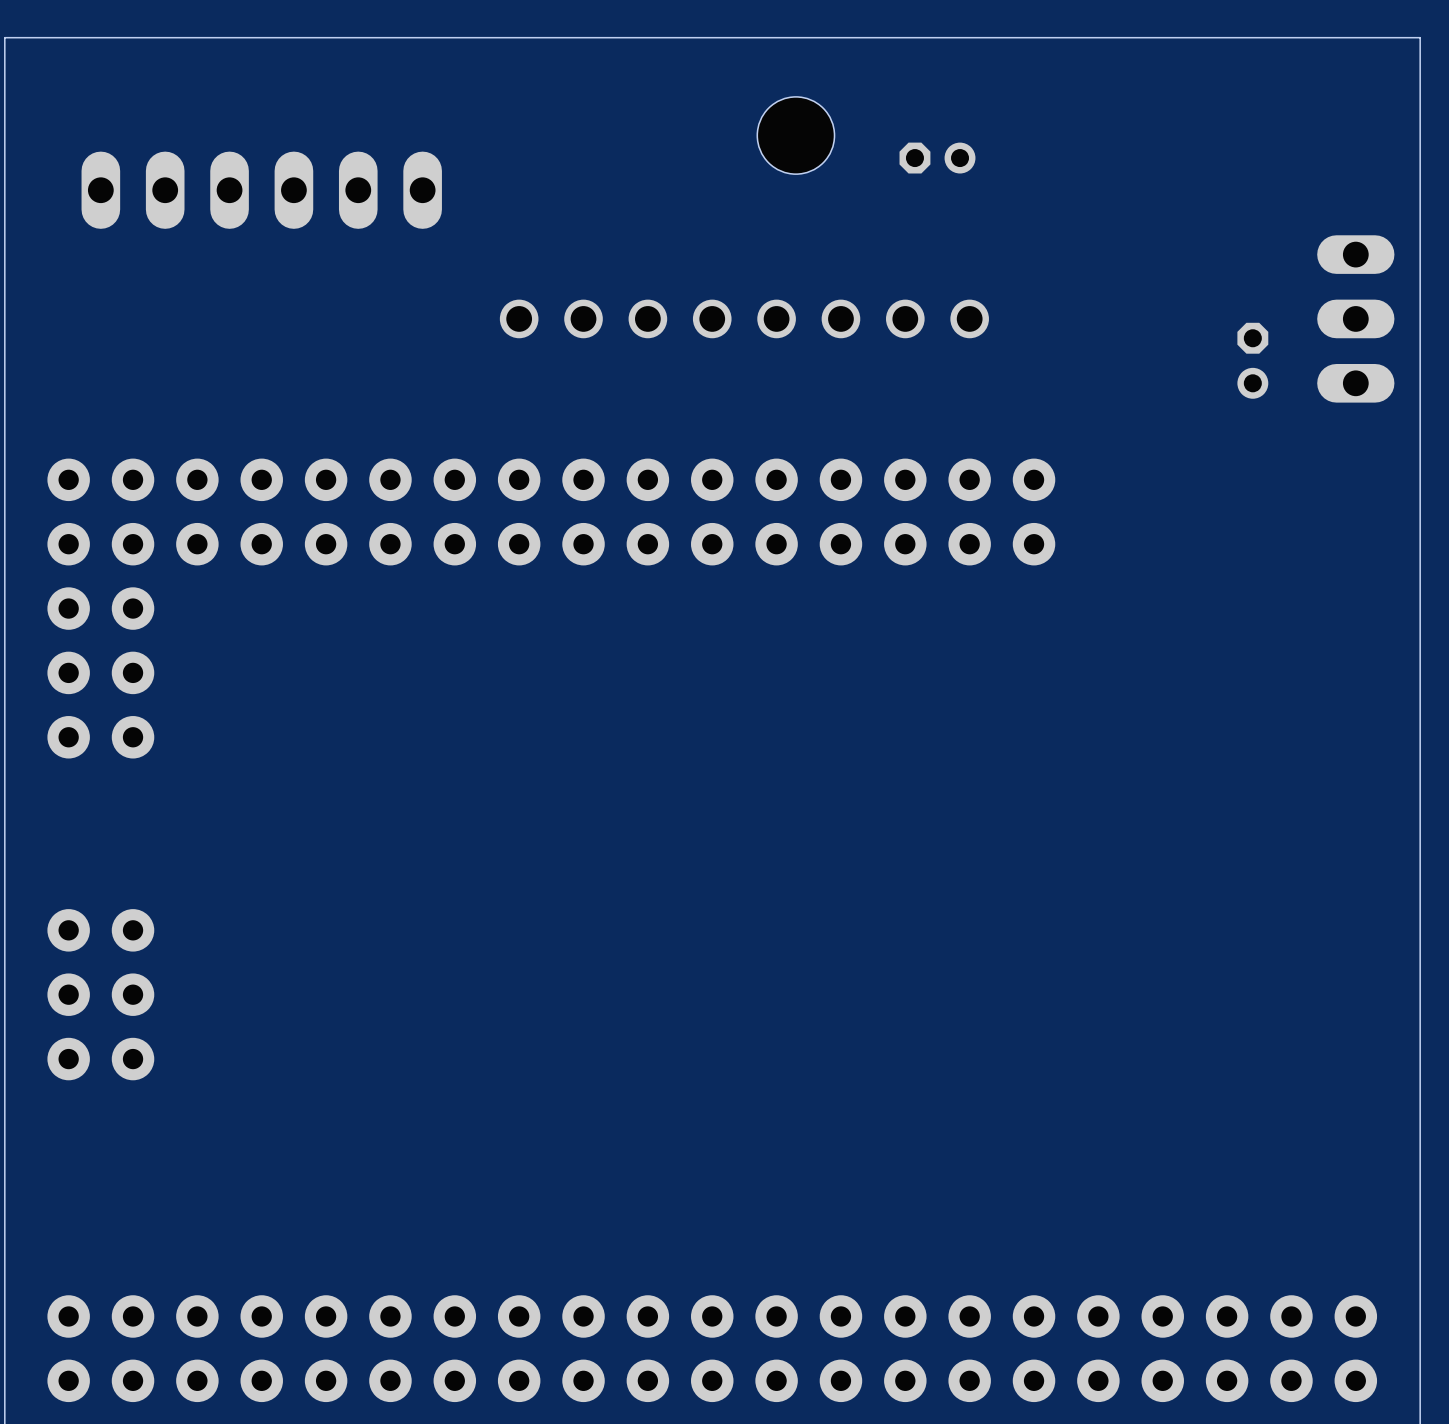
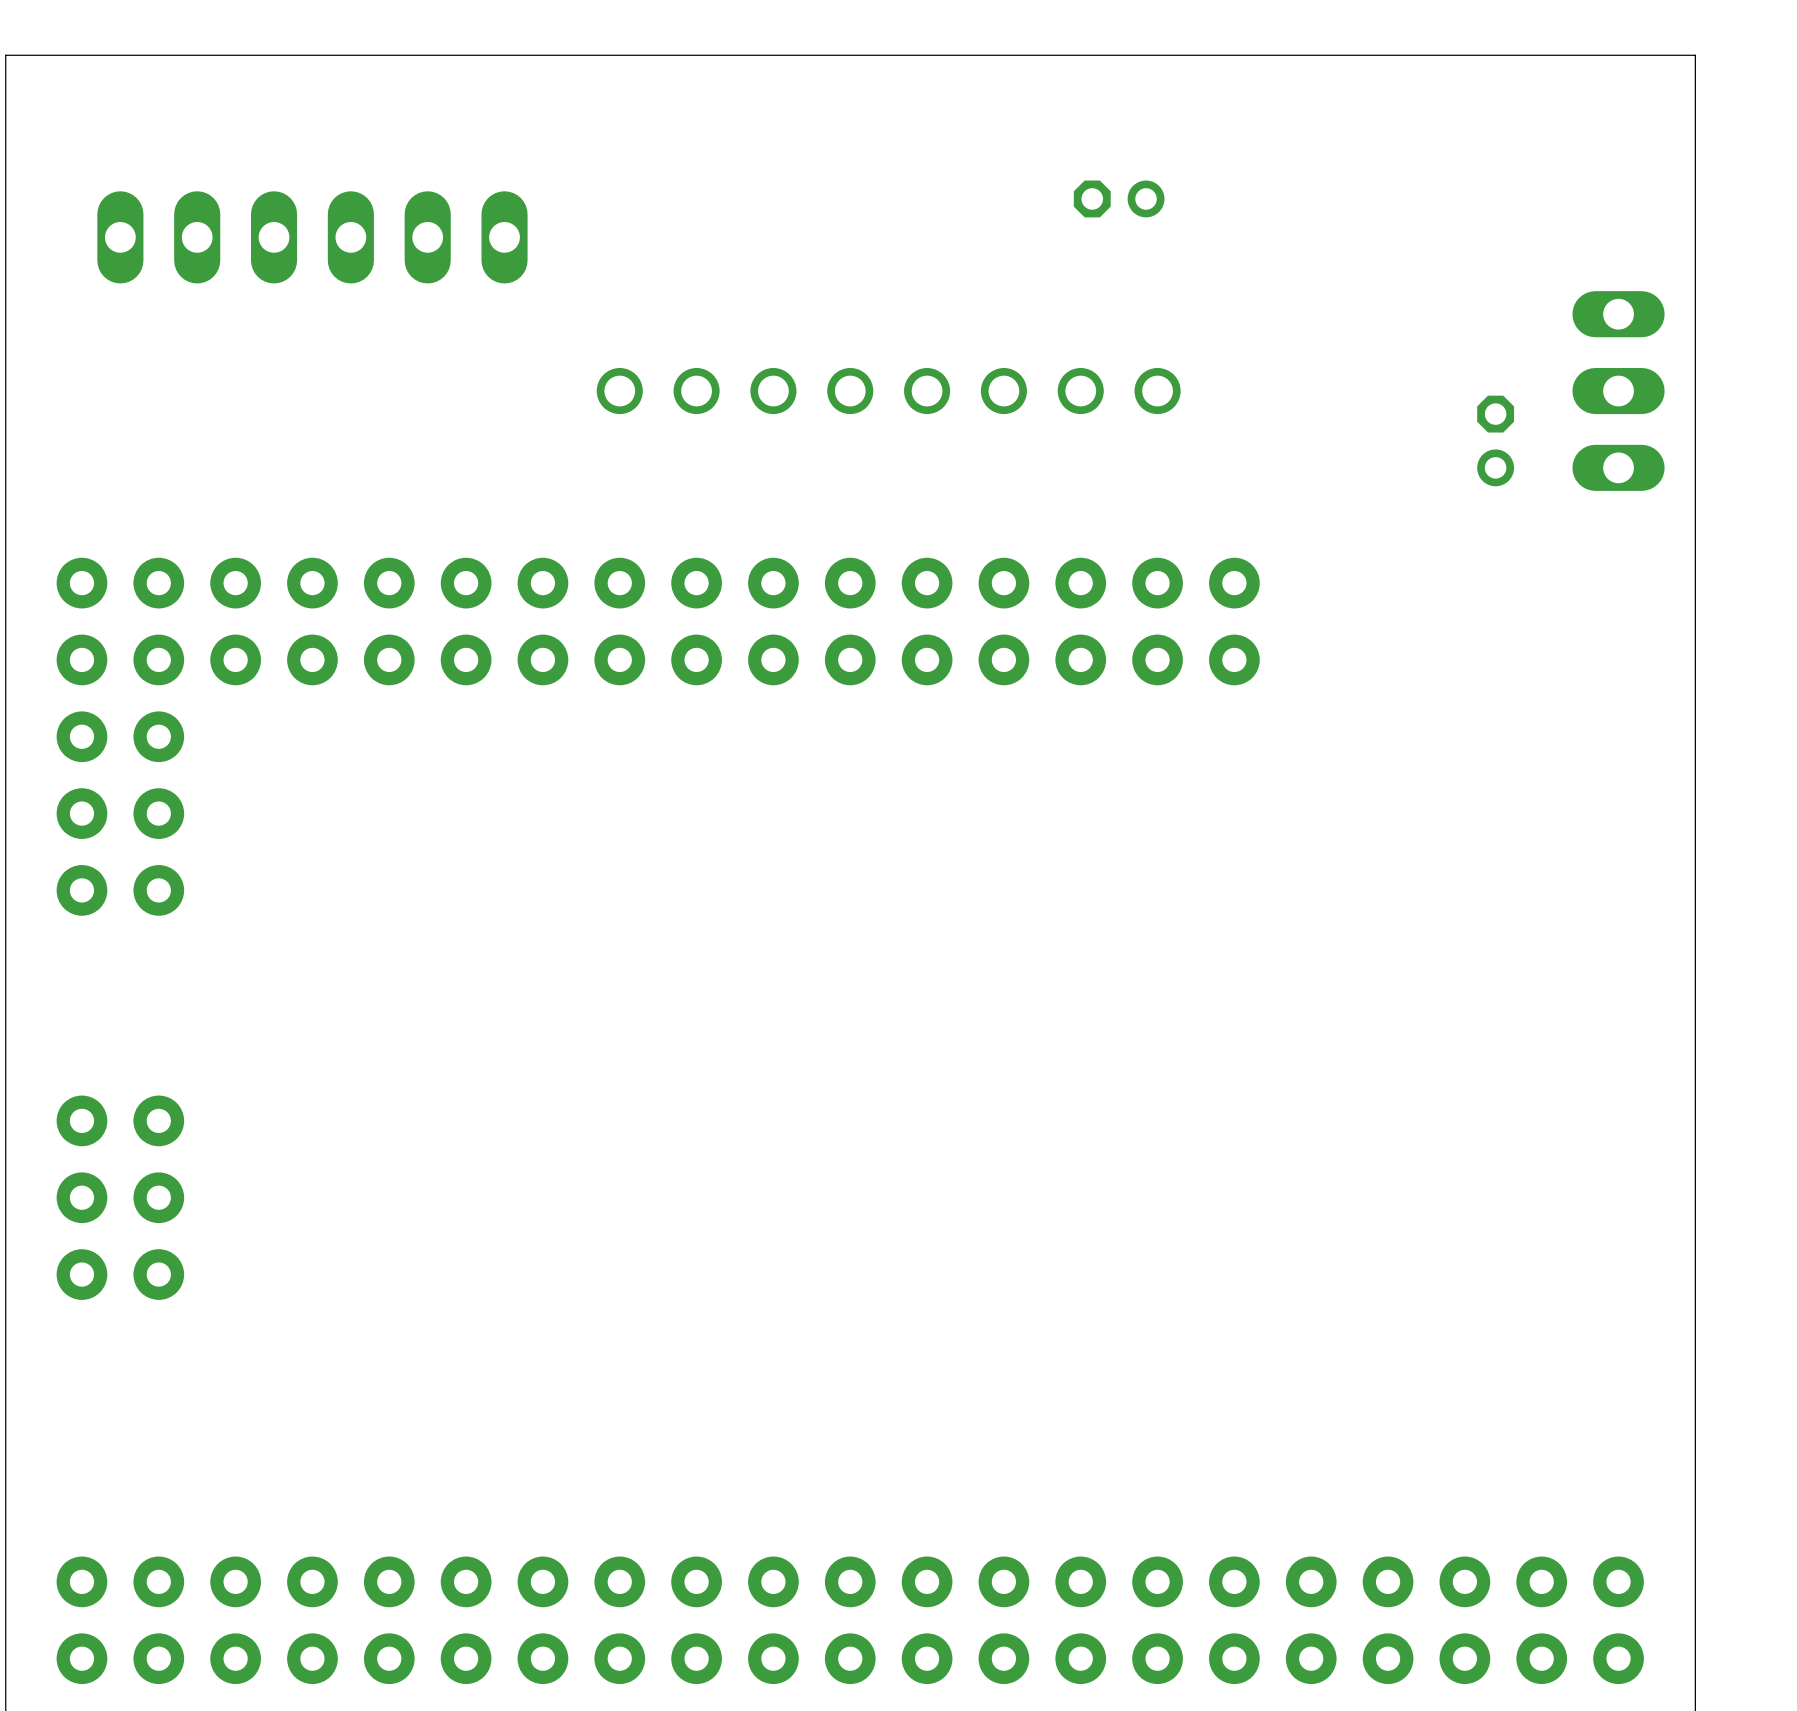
hole: (795, 135) -> none

